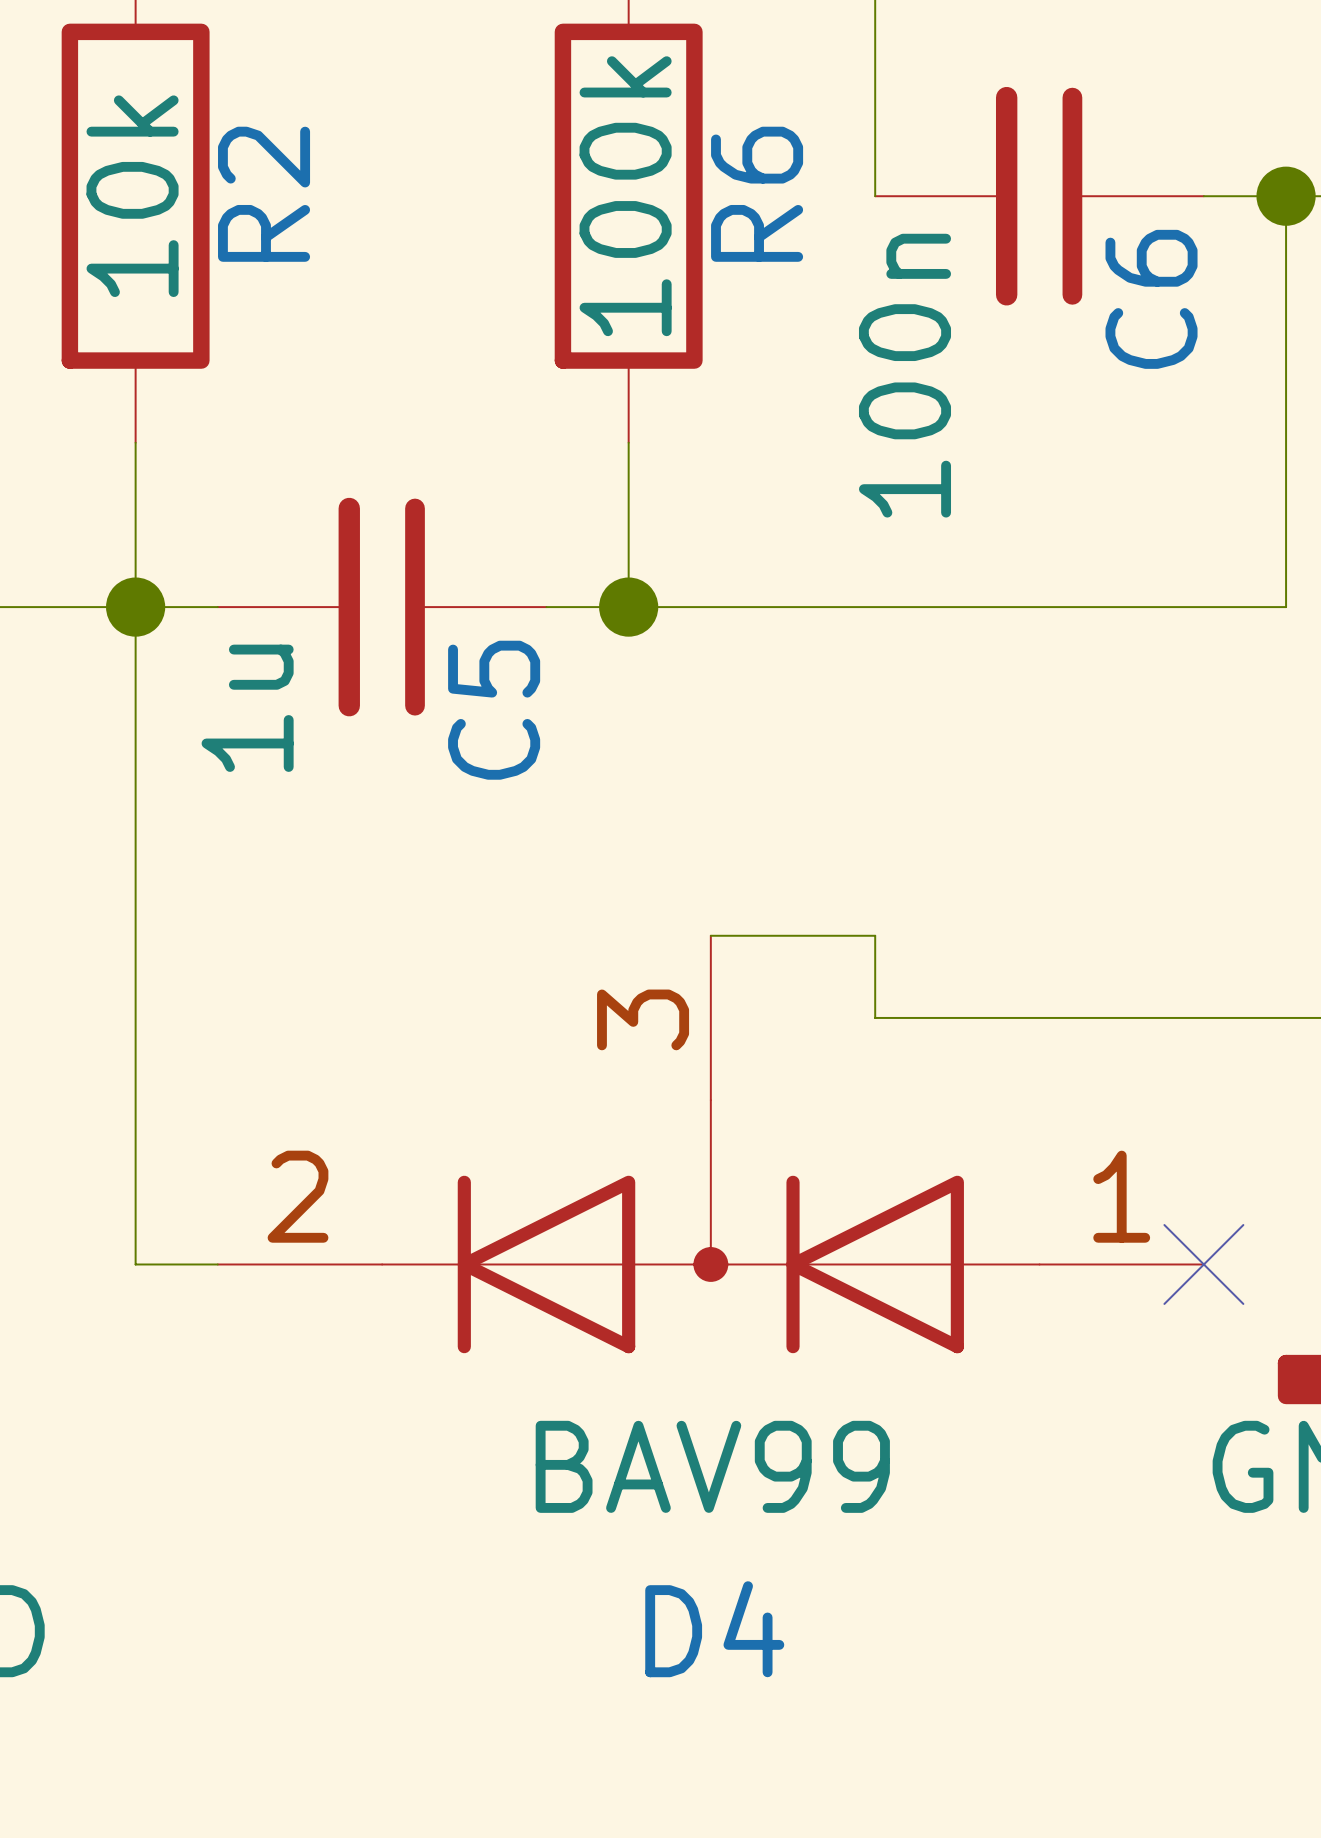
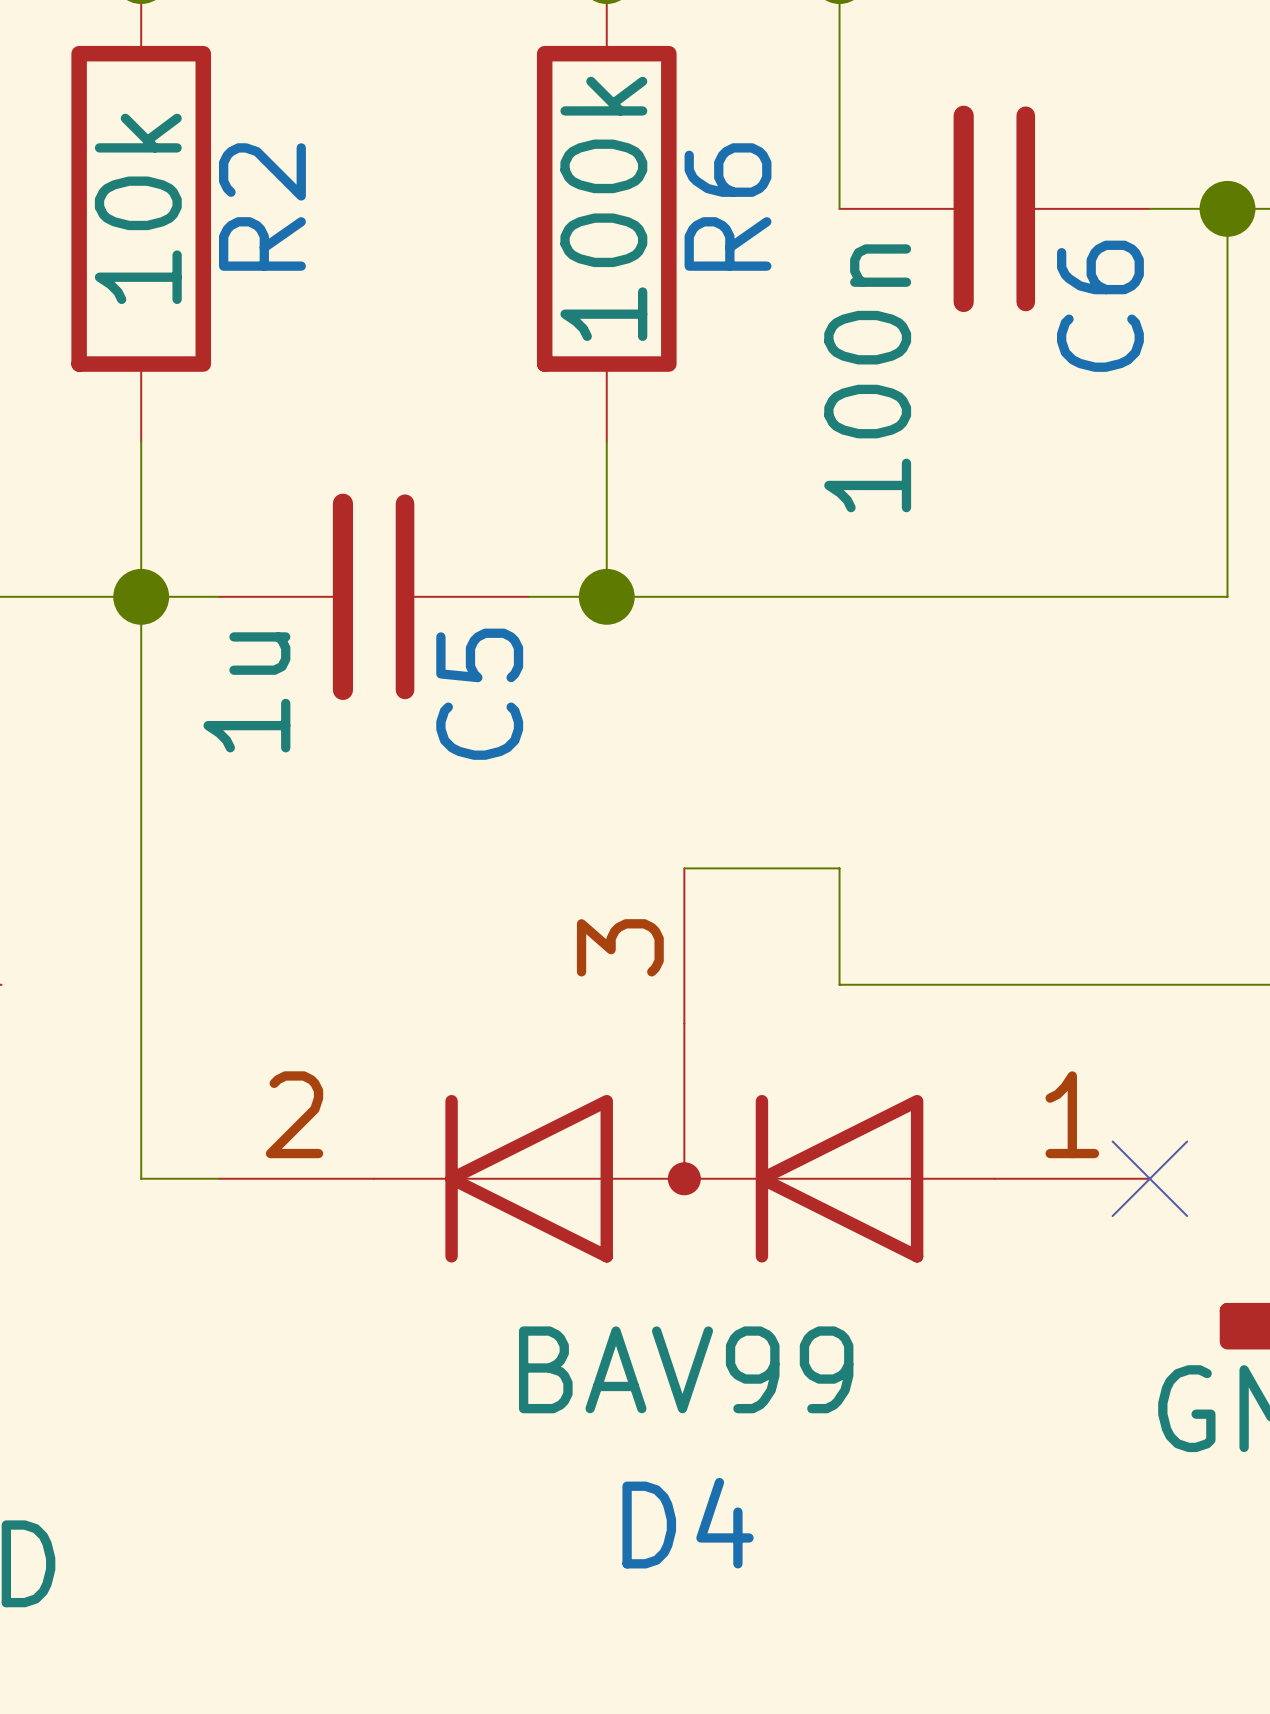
wire: (710, 935) (875, 935) -> (684, 868) (839, 868) (839, 907)
D4 position: (710, 1144) -> (684, 1065)
wire: (135, 1223) (135, 1264) (217, 1264) -> (141, 1178) (218, 1178)
no-connect mark position: (1203, 1264) -> (1149, 1178)

